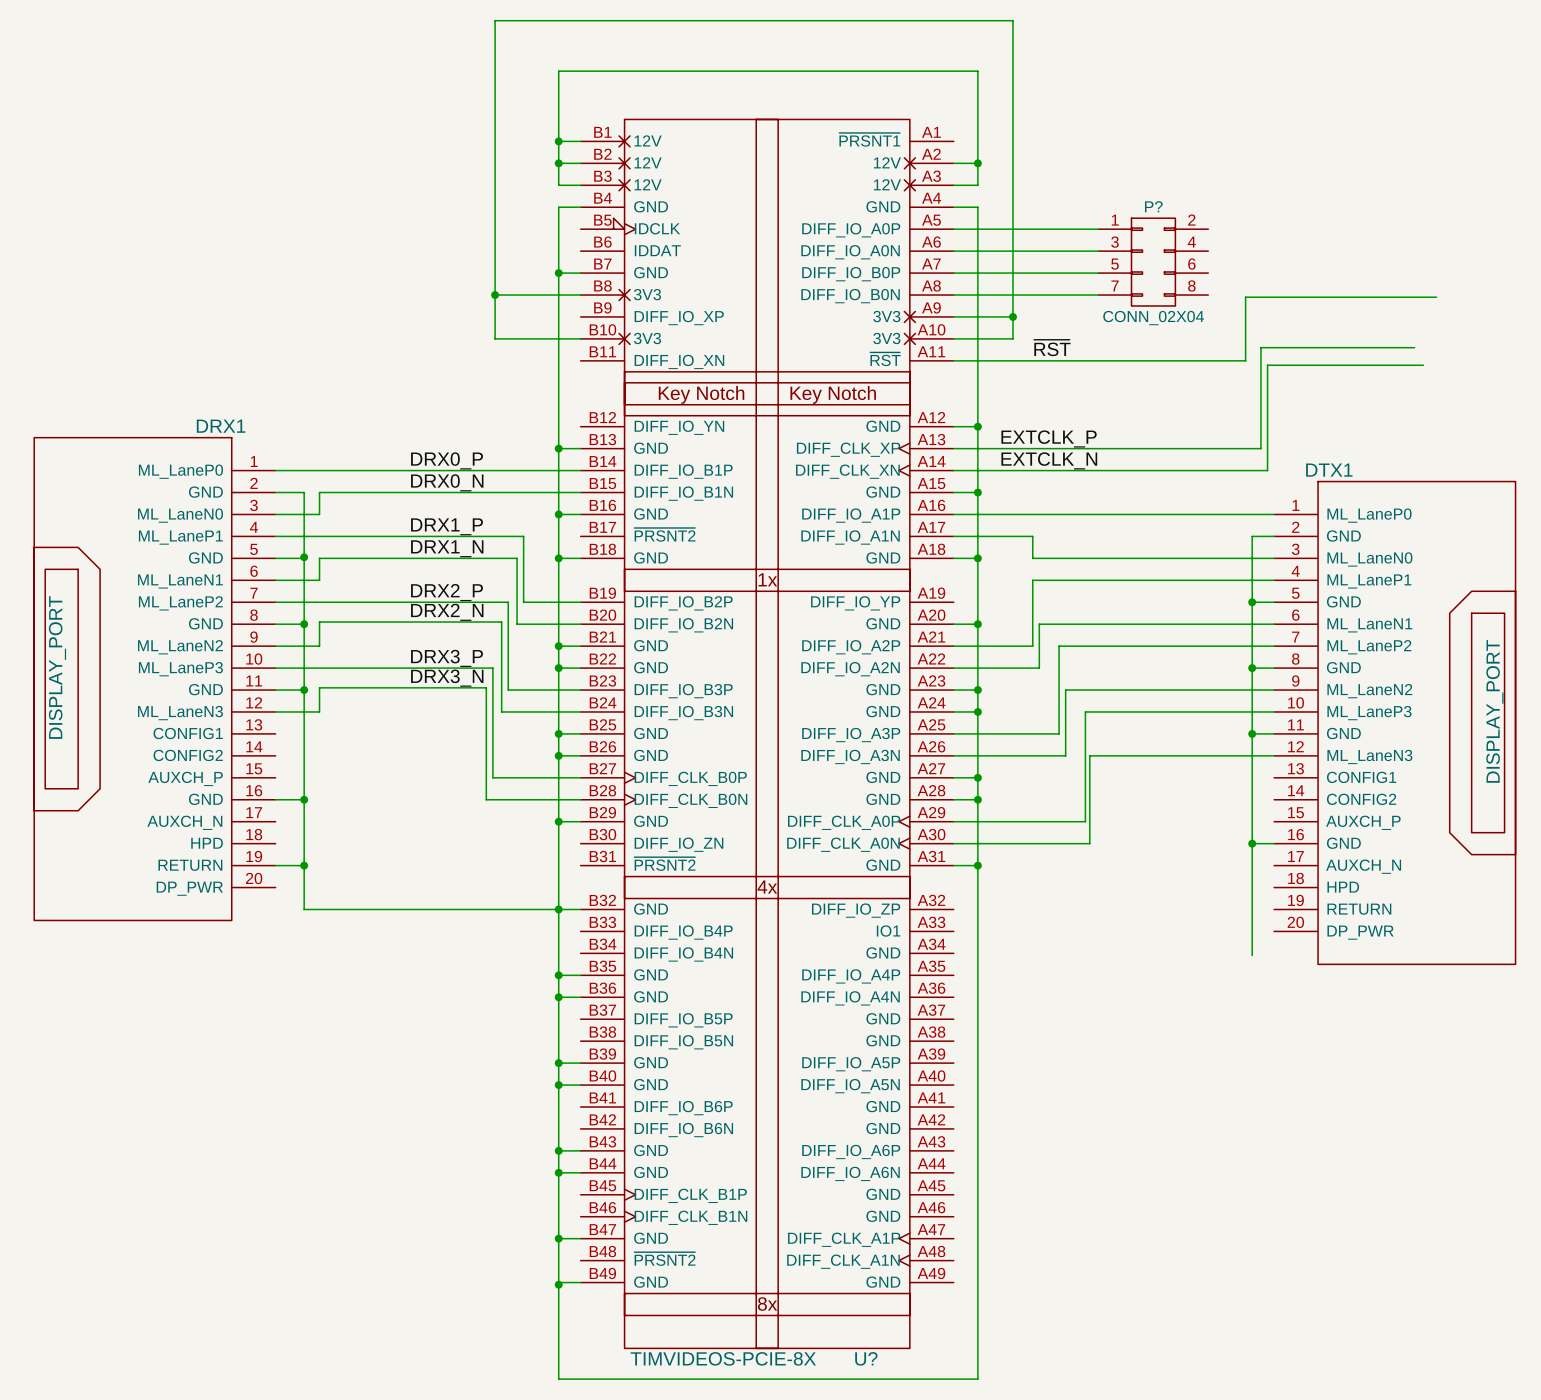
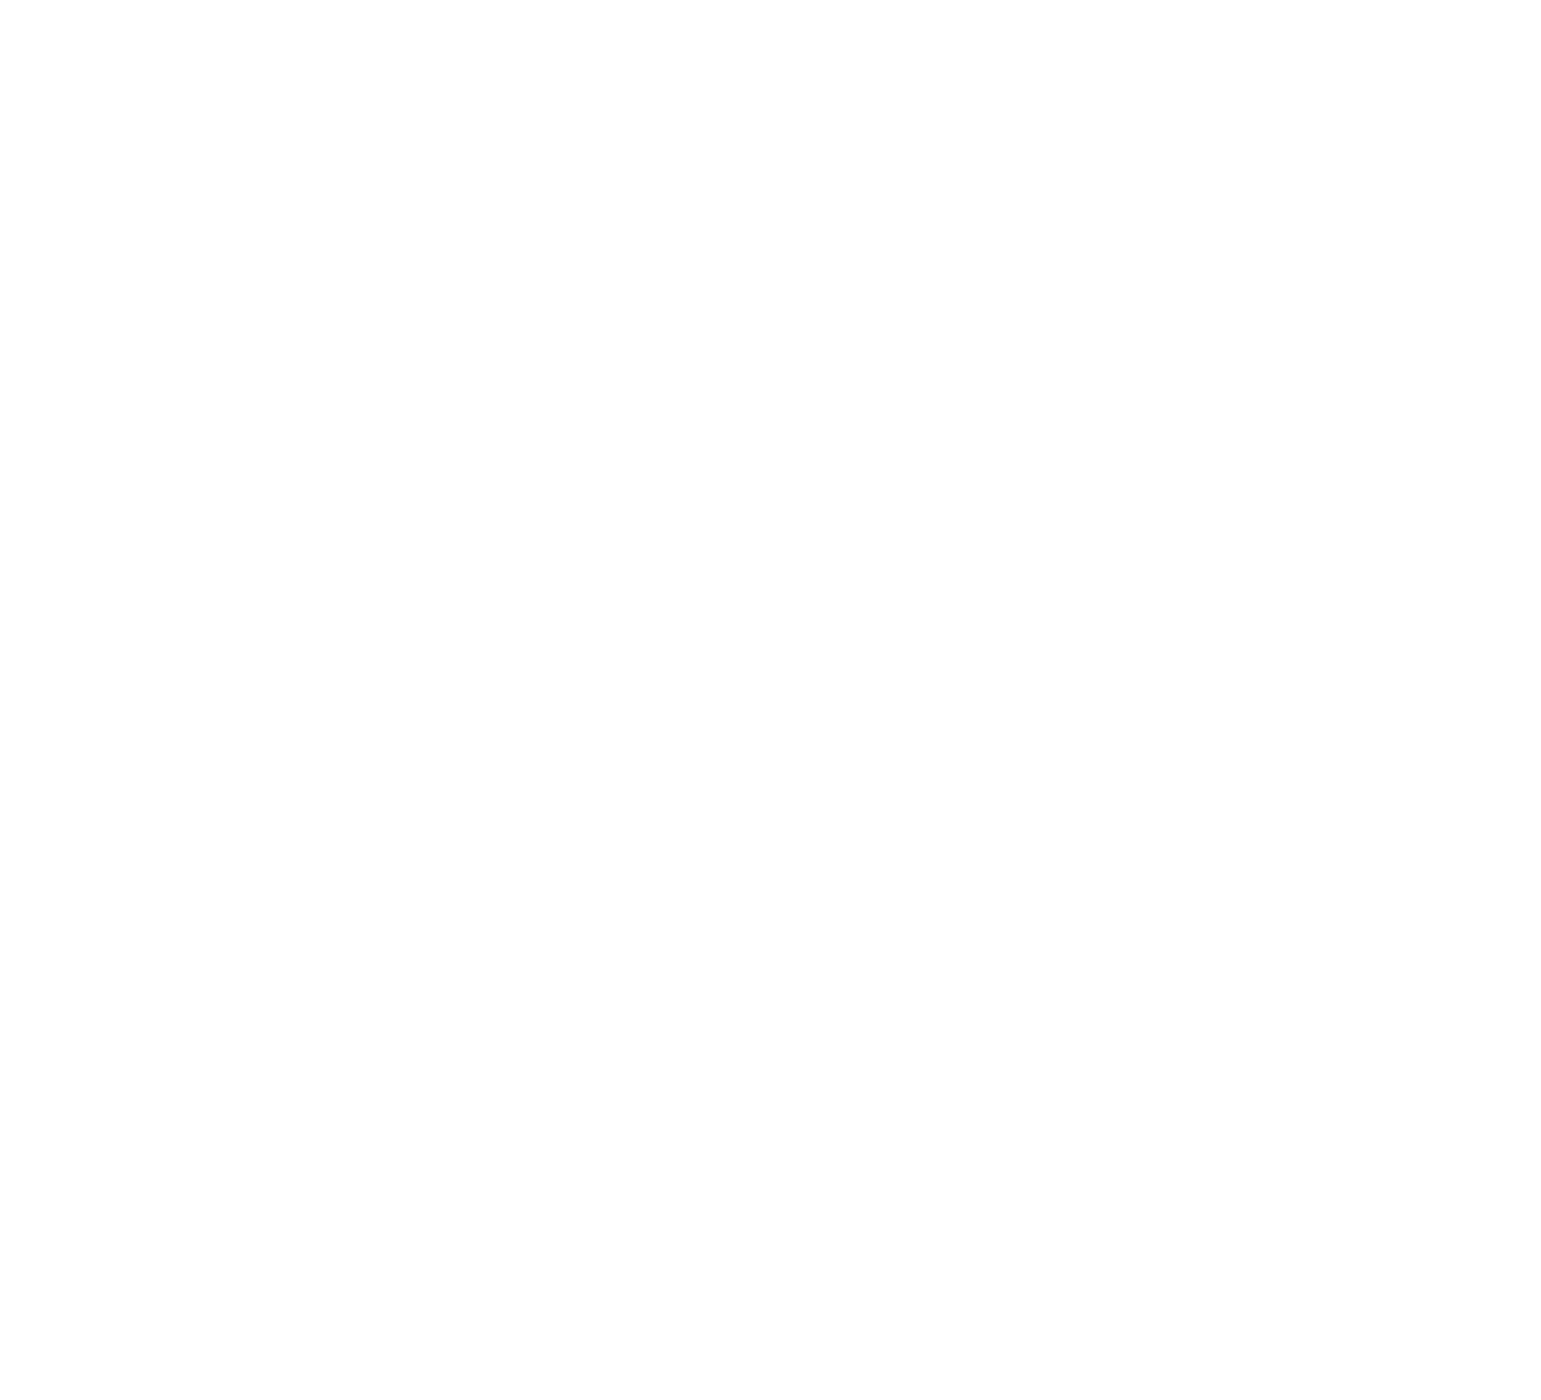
wire: (558, 141) (580, 141) -> none
junction: (558, 141) -> none
wire: (558, 163) (580, 163) -> none
junction: (558, 163) -> none
wire: (953, 163) (977, 163) -> none
junction: (977, 163) -> none
wire: (580, 185) (558, 185) (558, 71) (977, 71) (977, 185) (953, 185) -> none
wire: (580, 207) (558, 207) (558, 1379) (977, 1379) (977, 207) (953, 207) -> none
wire: (953, 229) (1098, 229) -> none
wire: (953, 251) (1098, 251) -> none
P?: CONN_02X04 (1153, 262) -> none
wire: (558, 273) (580, 273) -> none
junction: (558, 273) -> none
wire: (953, 273) (1098, 273) -> none
wire: (495, 295) (580, 295) -> none
junction: (495, 295) -> none
wire: (953, 295) (1098, 295) -> none
wire: (1436, 297) (1245, 297) (1245, 360) (953, 360) -> none
wire: (953, 316) (1012, 316) -> none
junction: (1012, 316) -> none
wire: (580, 338) (495, 338) (495, 20) (1012, 20) (1012, 338) (953, 338) -> none
label: ~{RST} (1052, 347) -> none
wire: (1414, 347) (1260, 347) (1260, 448) (953, 448) -> none
wire: (1423, 365) (1267, 365) (1267, 470) (953, 470) -> none
wire: (953, 426) (977, 426) -> none
junction: (977, 426) -> none
label: EXTCLK_P (1049, 438) -> none
wire: (558, 448) (580, 448) -> none
junction: (558, 448) -> none
label: DRX0_P (447, 460) -> none
label: EXTCLK_N (1049, 460) -> none
wire: (275, 470) (580, 470) -> none
label: DRX0_N (447, 482) -> none
wire: (275, 492) (304, 492) (304, 909) (580, 909) -> none
wire: (580, 492) (319, 492) (319, 514) (275, 514) -> none
wire: (953, 492) (977, 492) -> none
junction: (977, 492) -> none
wire: (558, 514) (580, 514) -> none
junction: (558, 514) -> none
wire: (953, 514) (1274, 514) -> none
label: DRX1_P (447, 526) -> none
wire: (275, 536) (523, 536) (523, 602) (580, 602) -> none
wire: (953, 536) (1032, 536) (1032, 558) (1274, 558) -> none
wire: (1274, 536) (1252, 536) (1252, 955) -> none
label: DRX1_N (447, 548) -> none
junction: (304, 557) -> none
wire: (275, 558) (304, 558) -> none
wire: (558, 558) (580, 558) -> none
junction: (558, 558) -> none
wire: (953, 558) (977, 558) -> none
junction: (977, 558) -> none
wire: (275, 580) (319, 580) (319, 558) (517, 558) (517, 624) (580, 624) -> none
wire: (1274, 580) (1032, 580) (1032, 646) (953, 646) -> none
label: DRX2_P (447, 592) -> none
wire: (275, 602) (508, 602) (508, 690) (580, 690) -> none
wire: (1252, 602) (1274, 602) -> none
junction: (1252, 602) -> none
label: DRX2_N (447, 612) -> none
wire: (275, 624) (304, 624) -> none
junction: (304, 624) -> none
wire: (953, 624) (977, 624) -> none
junction: (977, 624) -> none
wire: (1274, 624) (1039, 624) (1039, 668) (953, 668) -> none
wire: (275, 646) (319, 646) (319, 622) (501, 622) (501, 711) (580, 711) -> none
wire: (558, 646) (580, 646) -> none
junction: (558, 646) -> none
wire: (1274, 646) (1059, 646) (1059, 733) (953, 733) -> none
label: DRX3_P (447, 658) -> none
wire: (275, 668) (492, 668) (492, 777) (580, 777) -> none
wire: (558, 668) (580, 668) -> none
junction: (558, 668) -> none
wire: (1252, 668) (1274, 668) -> none
junction: (1252, 668) -> none
label: DRX3_N (447, 678) -> none
DRX1: DISPLAY_PORT (154, 679) -> none
wire: (275, 690) (304, 690) -> none
junction: (304, 690) -> none
wire: (953, 690) (977, 690) -> none
junction: (977, 690) -> none
wire: (1274, 690) (1065, 690) (1065, 755) (953, 755) -> none
wire: (275, 711) (319, 711) (319, 687) (486, 687) (486, 799) (580, 799) -> none
wire: (953, 711) (977, 711) -> none
junction: (977, 711) -> none
wire: (1274, 711) (1085, 711) (1085, 821) (953, 821) -> none
DTX1: DISPLAY_PORT (1394, 722) -> none
wire: (558, 733) (580, 733) -> none
junction: (558, 733) -> none
U?: TIMVIDEOS-PCIE-8X (767, 733) -> none
wire: (1252, 733) (1274, 733) -> none
junction: (1252, 733) -> none
wire: (558, 755) (580, 755) -> none
junction: (558, 755) -> none
wire: (1274, 755) (1089, 755) (1089, 843) (953, 843) -> none
wire: (953, 777) (977, 777) -> none
junction: (977, 777) -> none
wire: (275, 799) (304, 799) -> none
junction: (304, 799) -> none
wire: (953, 799) (977, 799) -> none
junction: (977, 799) -> none
wire: (558, 821) (580, 821) -> none
junction: (558, 821) -> none
wire: (1252, 843) (1274, 843) -> none
junction: (1252, 843) -> none
wire: (275, 865) (304, 865) -> none
junction: (304, 865) -> none
wire: (953, 865) (977, 865) -> none
junction: (977, 865) -> none
junction: (558, 909) -> none
wire: (558, 975) (580, 975) -> none
junction: (558, 975) -> none
wire: (558, 997) (580, 997) -> none
junction: (558, 997) -> none
wire: (558, 1063) (580, 1063) -> none
junction: (558, 1063) -> none
wire: (558, 1085) (580, 1085) -> none
junction: (558, 1085) -> none
wire: (558, 1150) (580, 1150) -> none
junction: (558, 1150) -> none
wire: (558, 1172) (580, 1172) -> none
junction: (558, 1172) -> none
wire: (558, 1238) (580, 1238) -> none
junction: (558, 1238) -> none
wire: (558, 1282) (580, 1282) -> none
junction: (558, 1284) -> none

